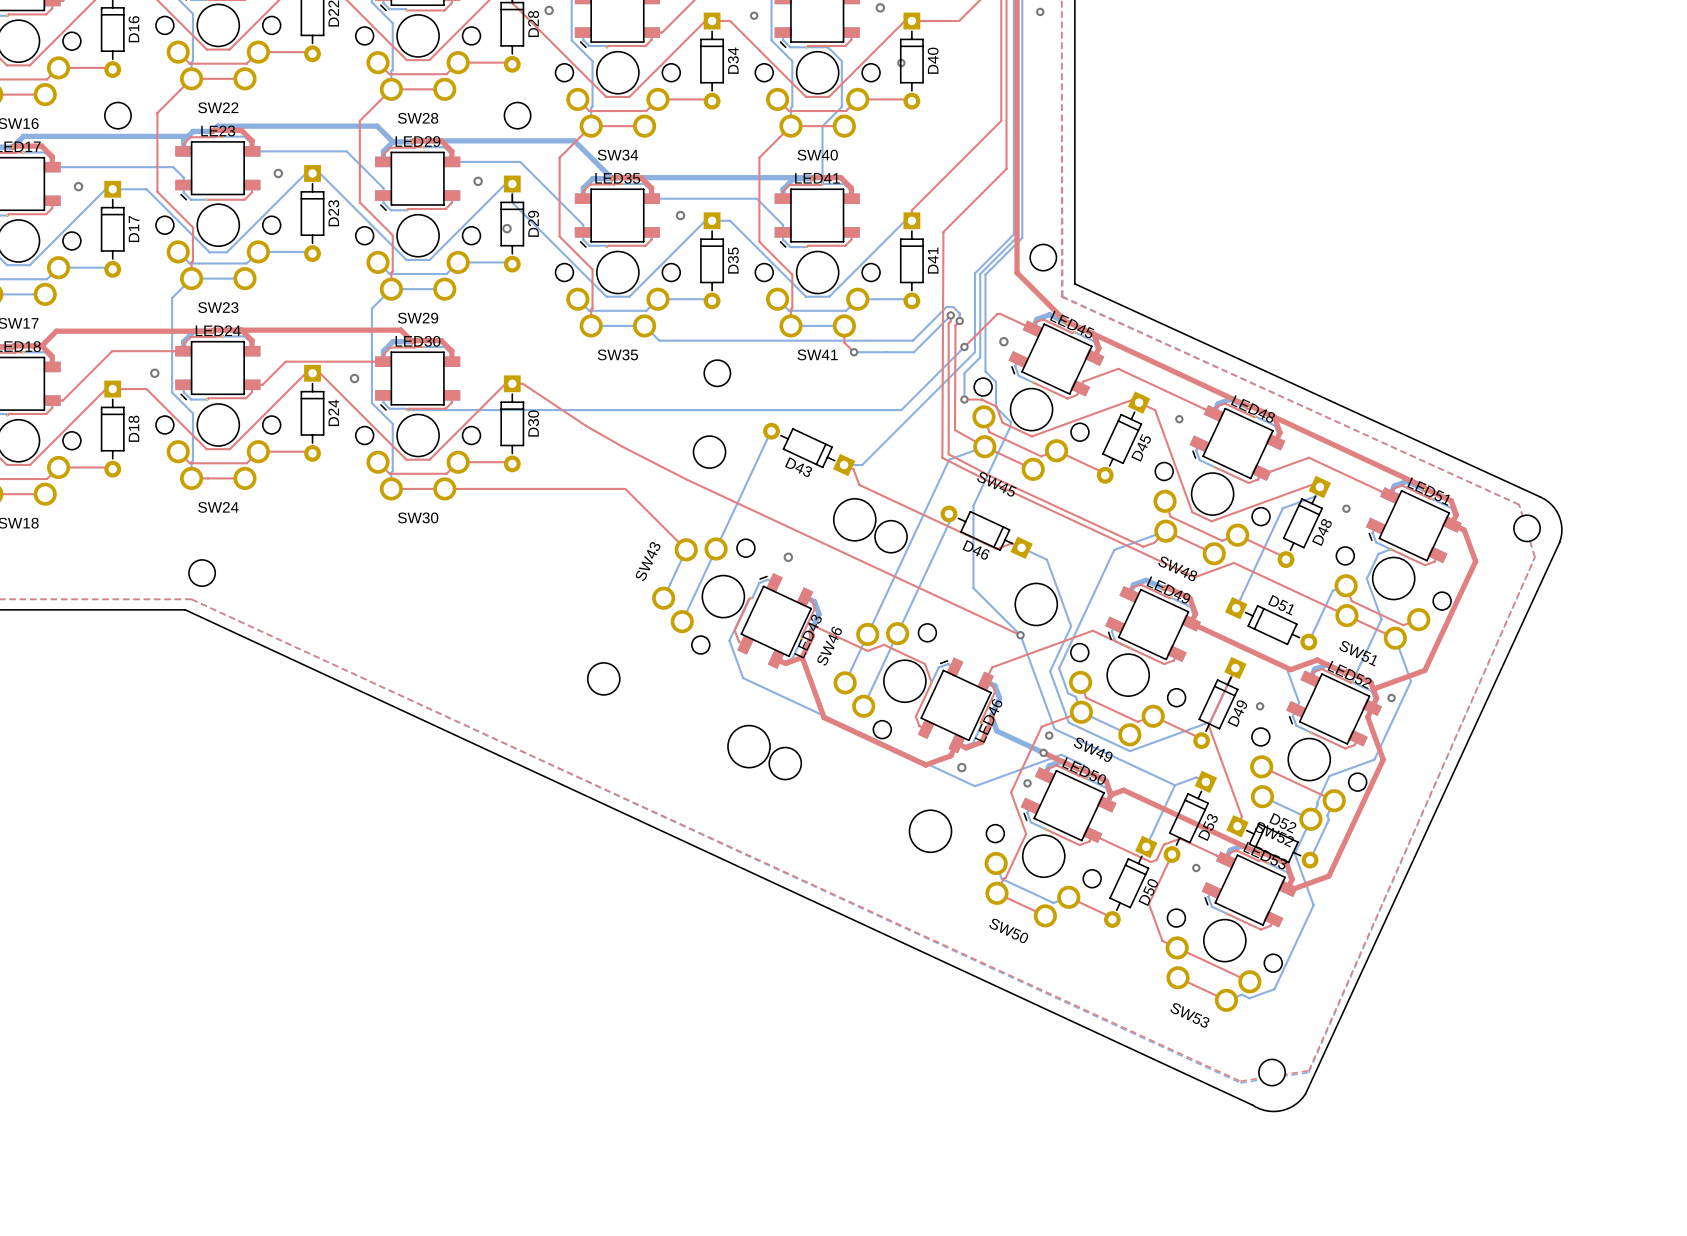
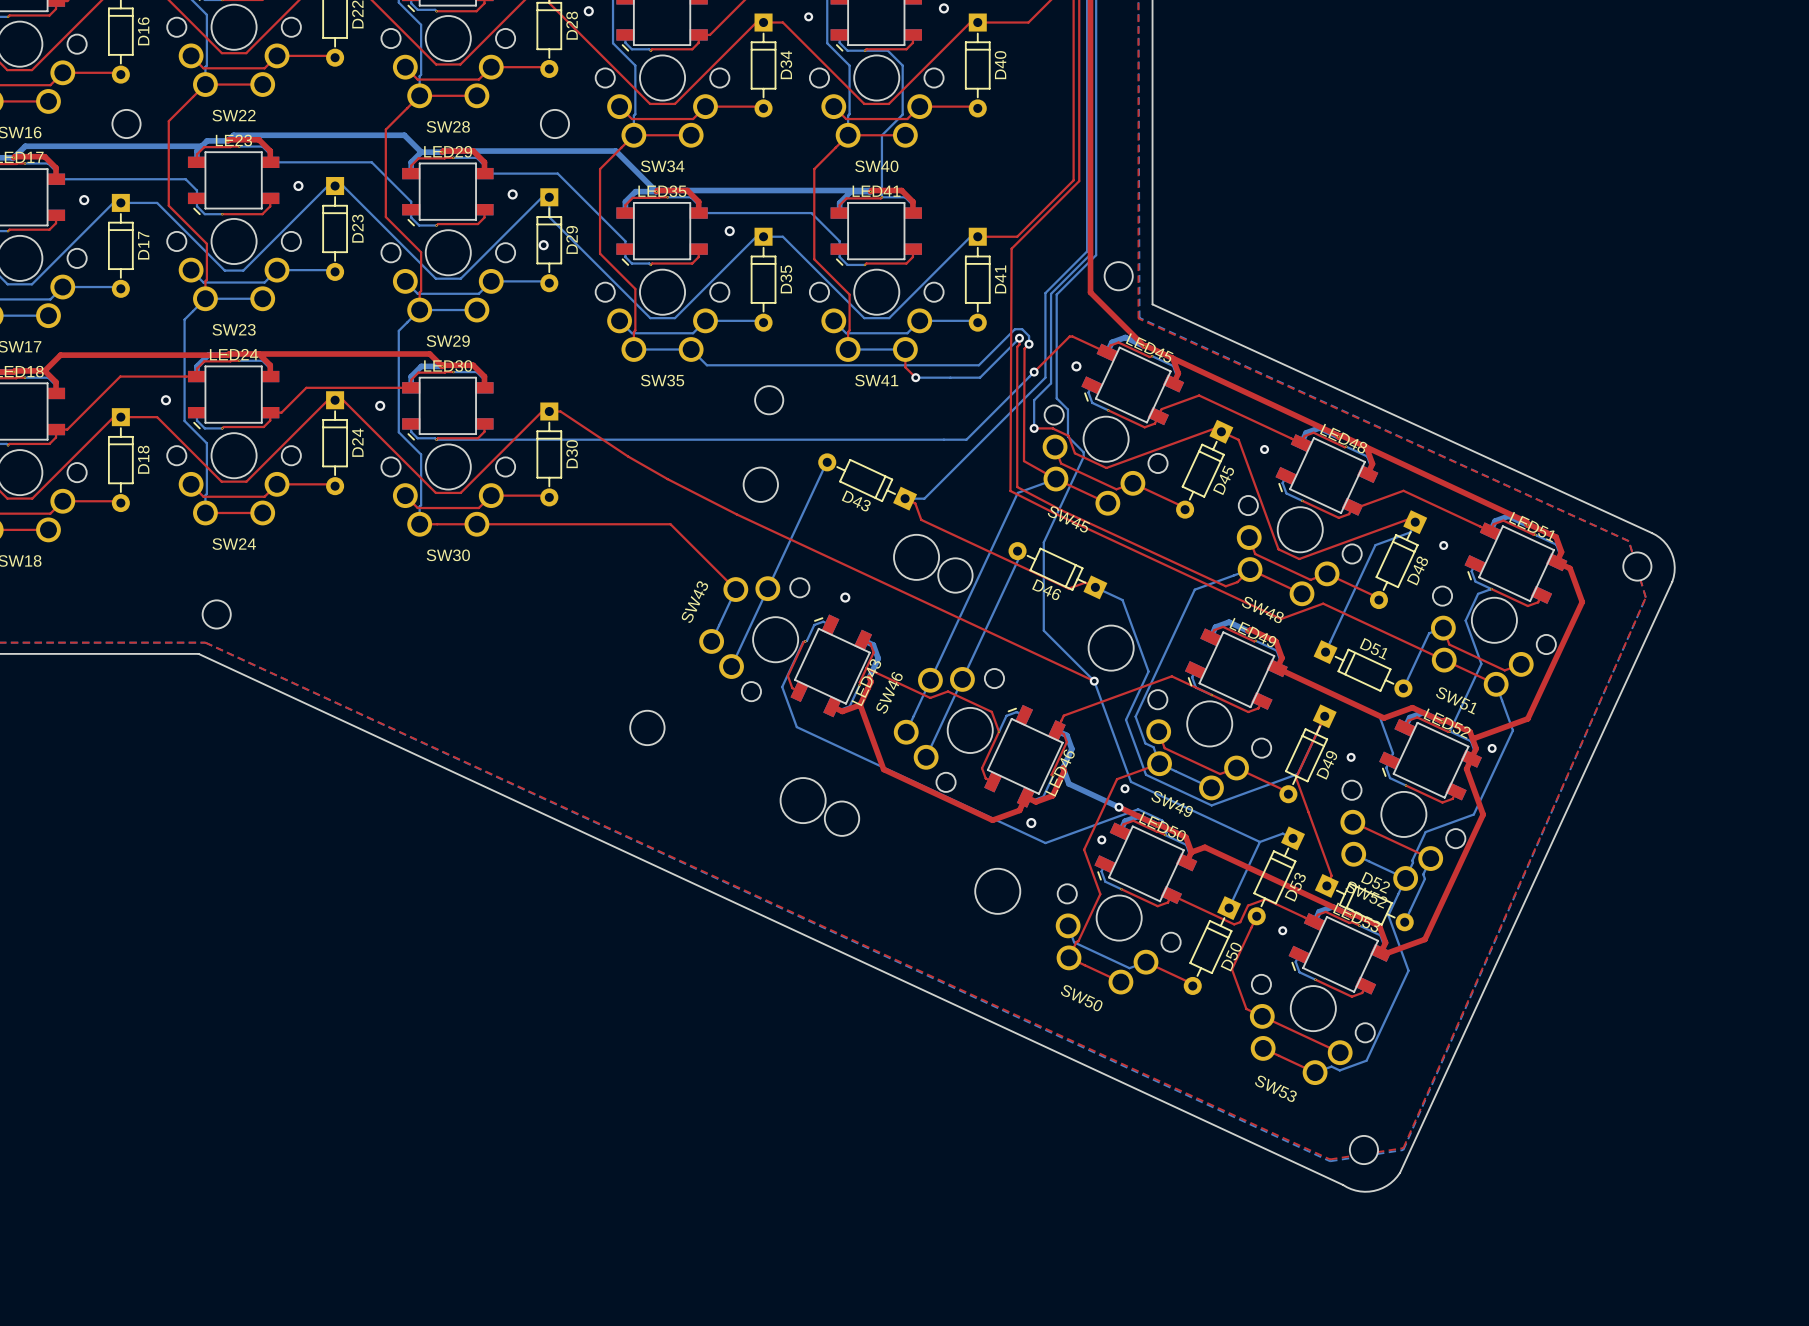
via: (1040, 11) -> none
via: (901, 63) -> none
top track: (1001, 120) (911, 210) (911, 220) -> (1073, 129) (1073, 180) (1017, 236) (977, 236)

